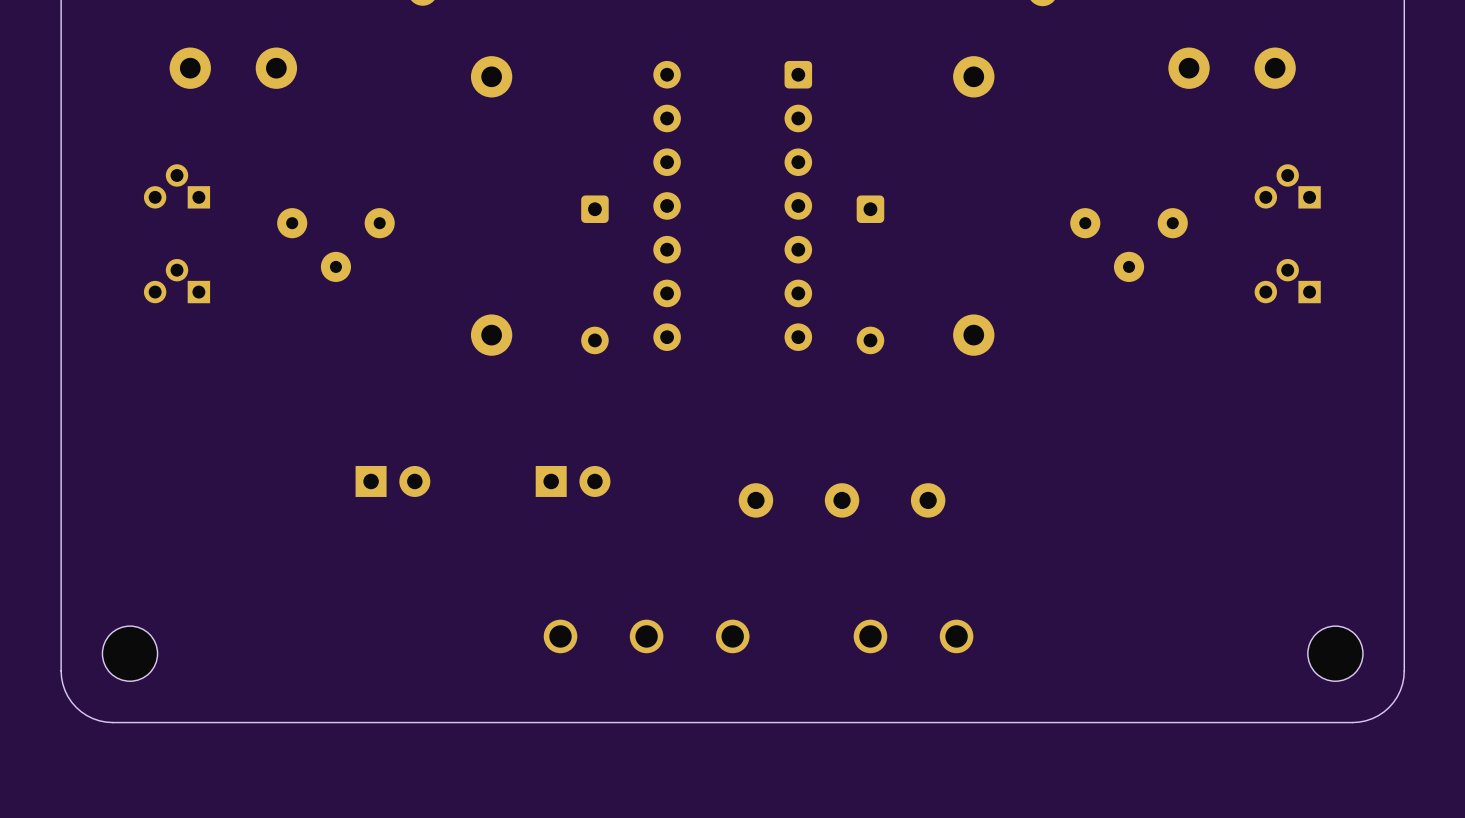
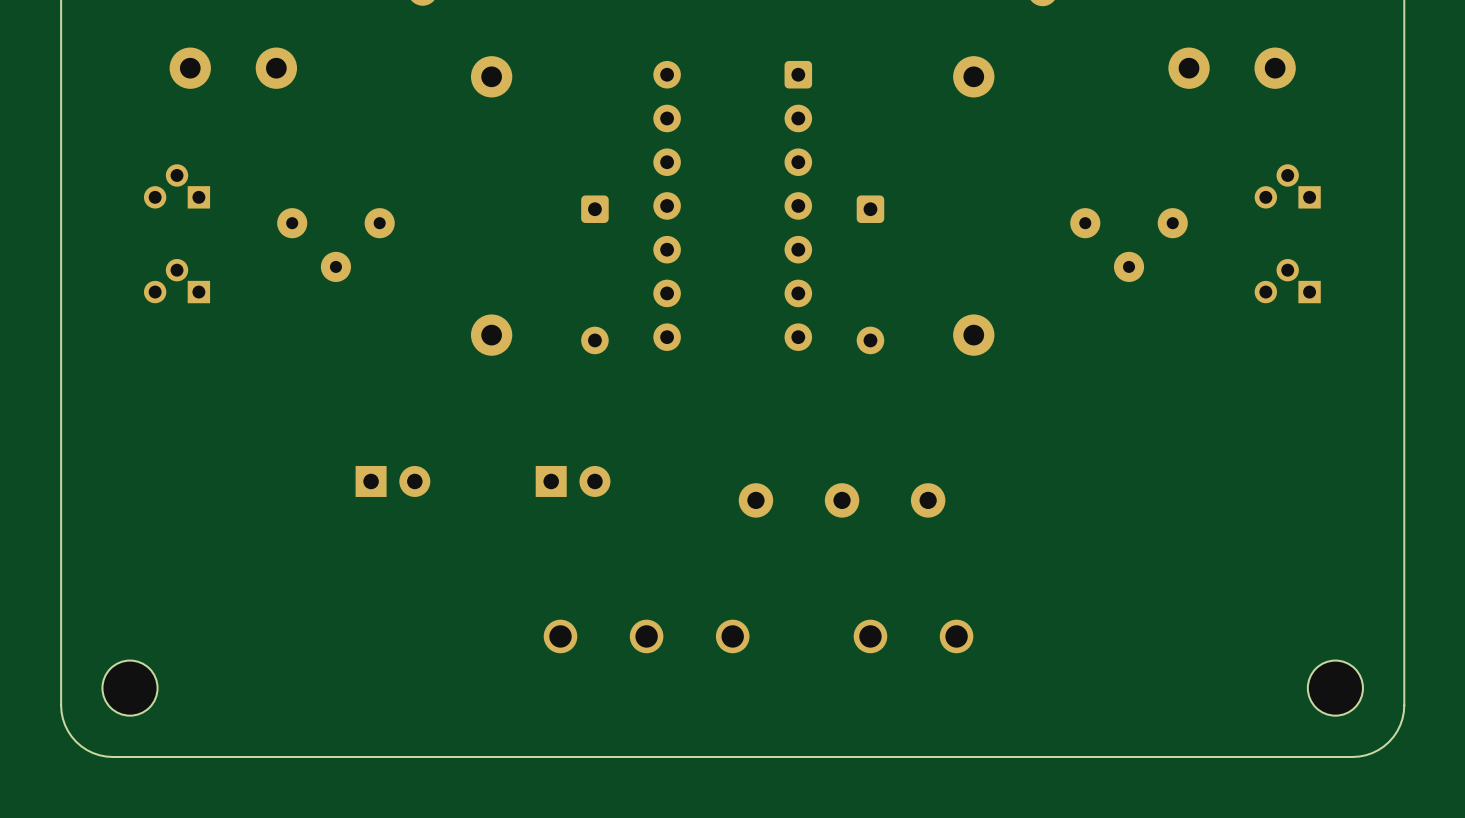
part position: (130, 653) -> (130, 688)
part position: (1335, 653) -> (1335, 688)
board edge: (1404, 670) (1400, 690) (1389, 707) (1372, 718) (1352, 722) (112, 722) (93, 718) (76, 707) (65, 690) (61, 670) -> (1404, 670) (1403, 712) (1397, 731) (1389, 741) (1378, 750) (1366, 755) (1352, 756) (106, 756) (86, 750) (76, 741) (68, 731) (61, 712) (61, 670)

